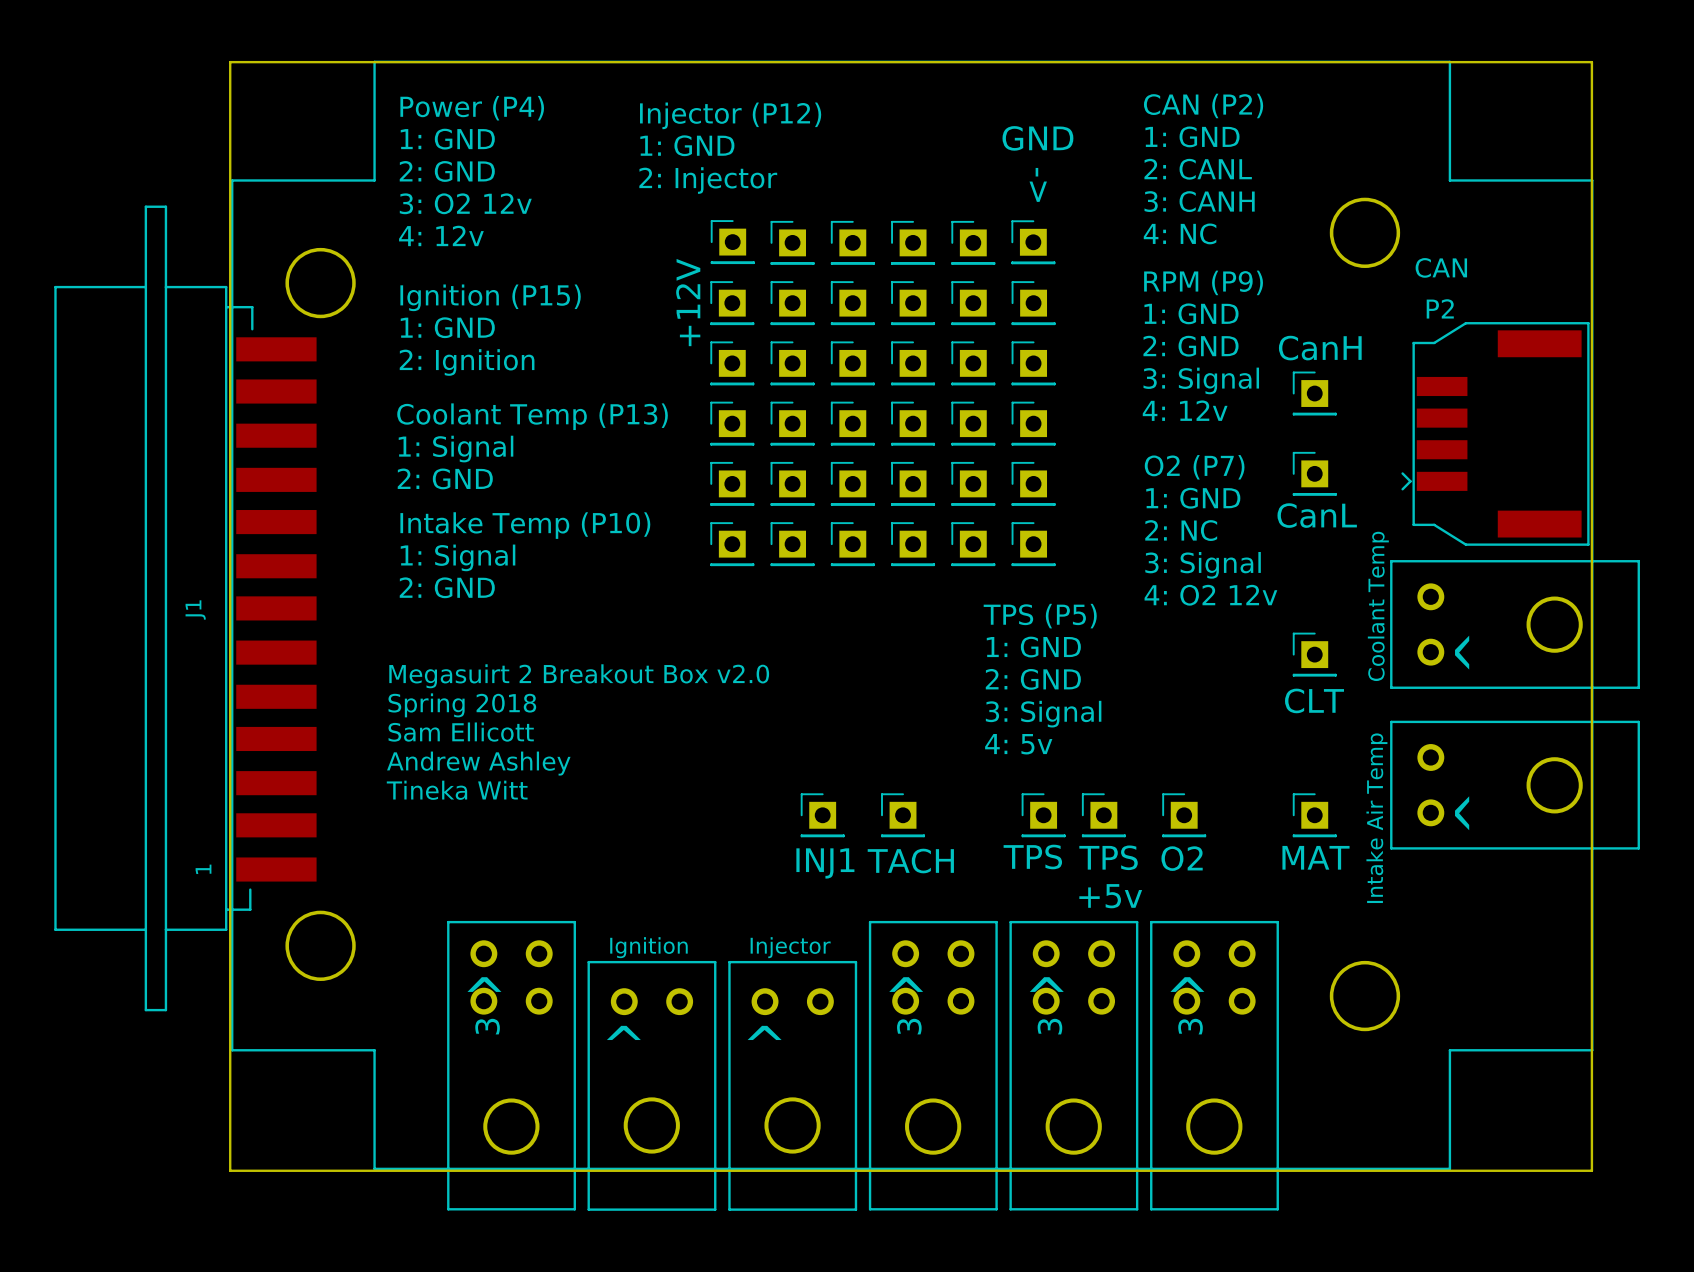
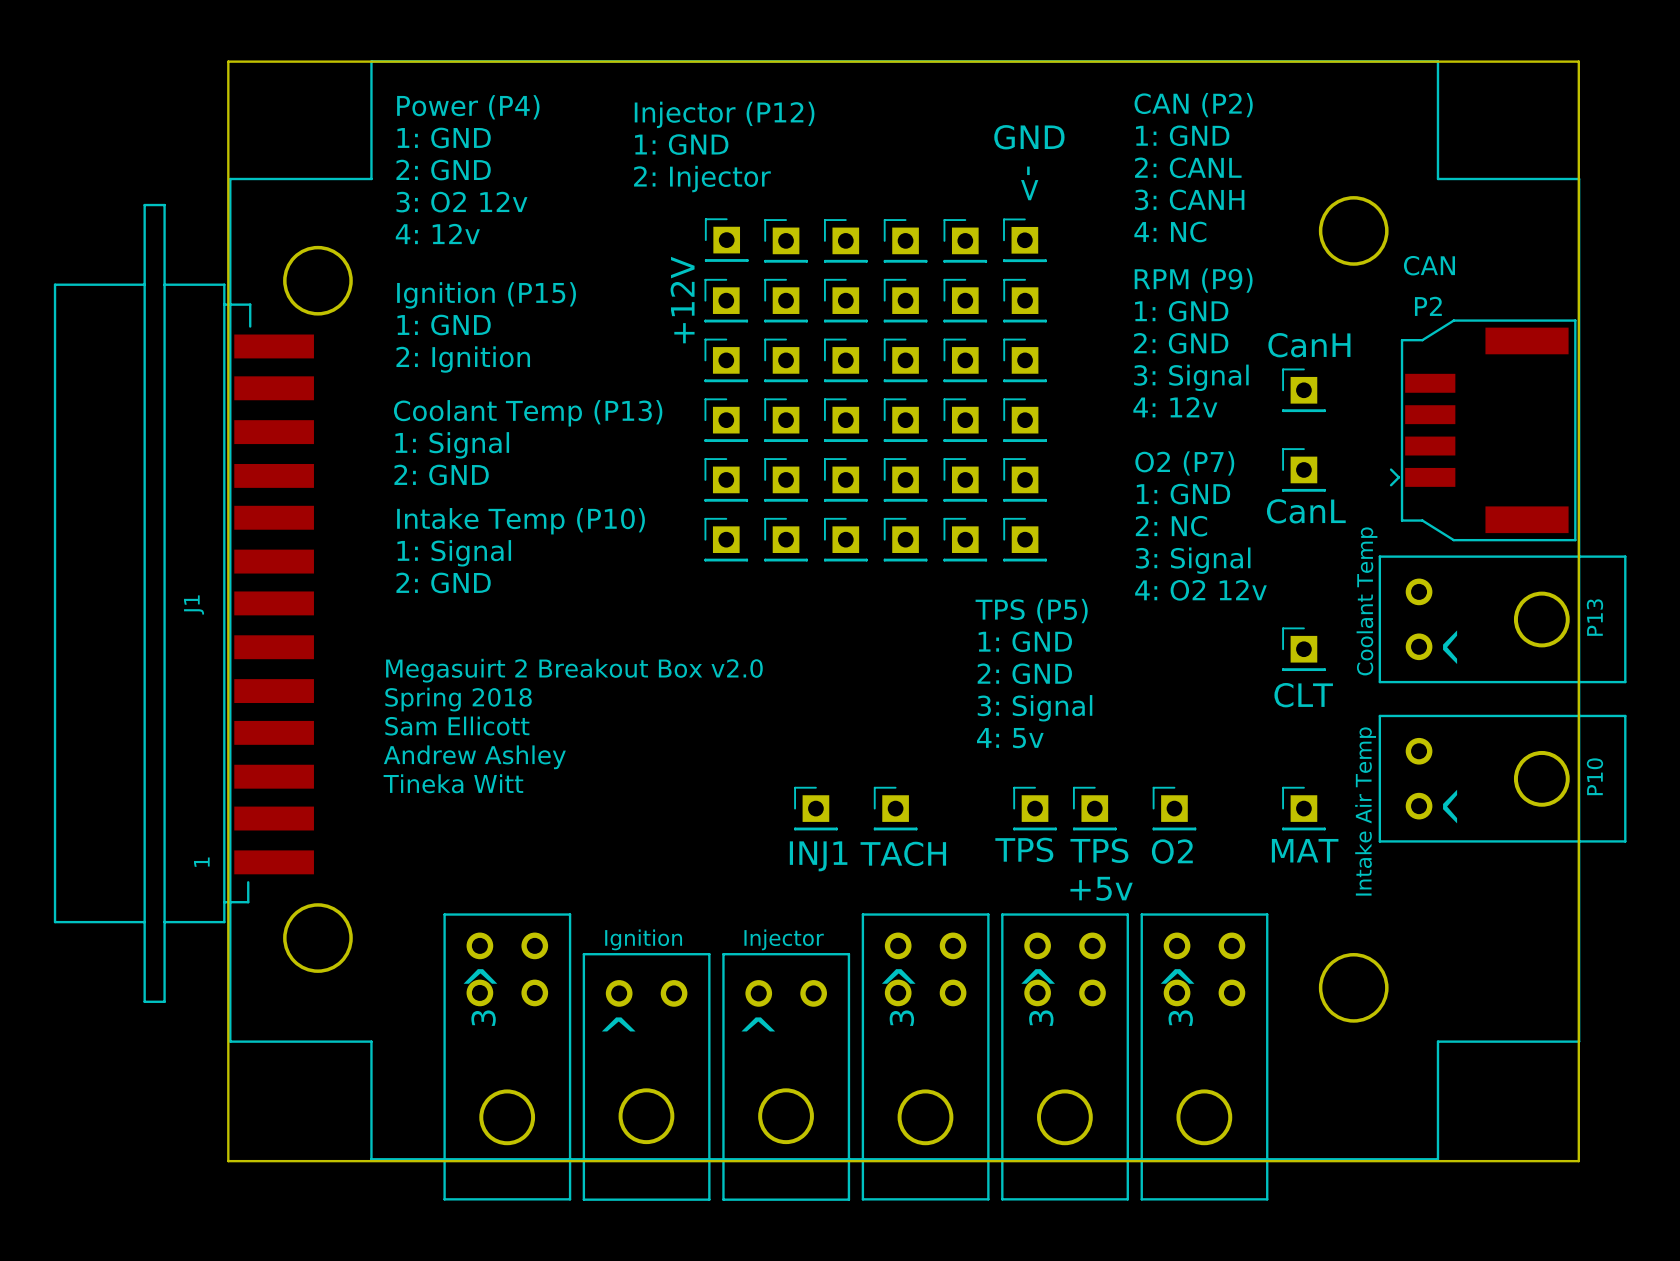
P13 name: none -> P13 (1594, 617)
P10 name: none -> P10 (1594, 776)

